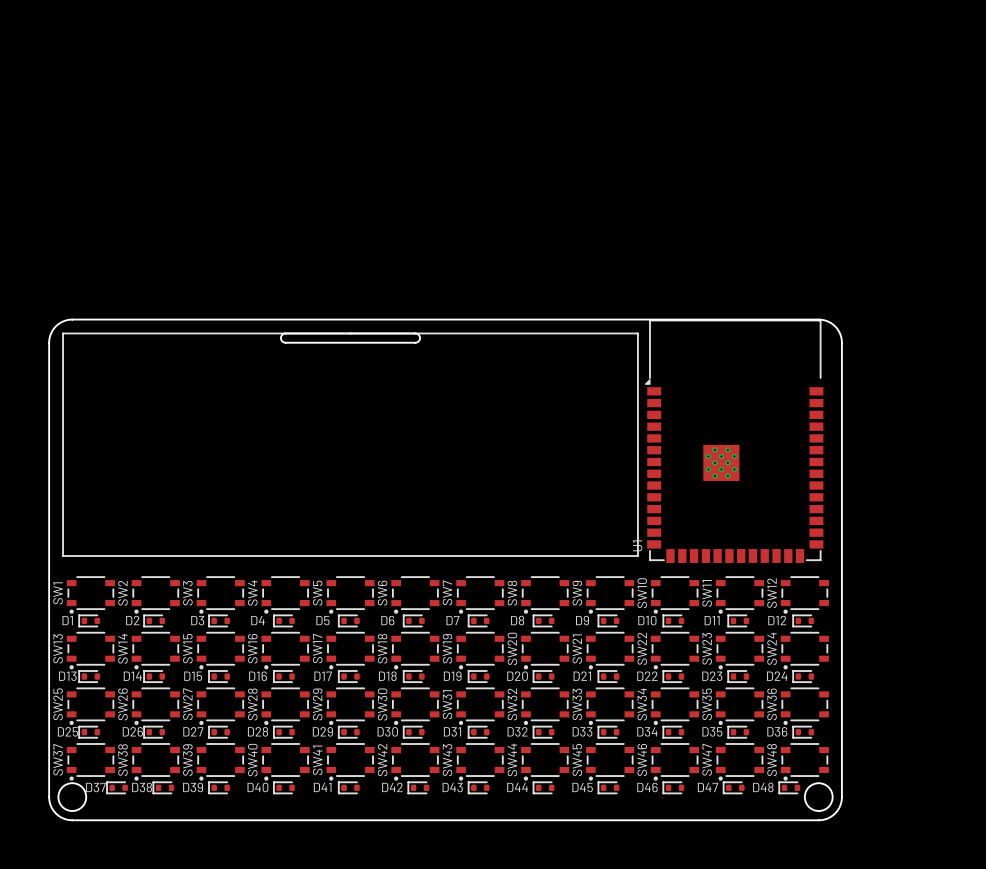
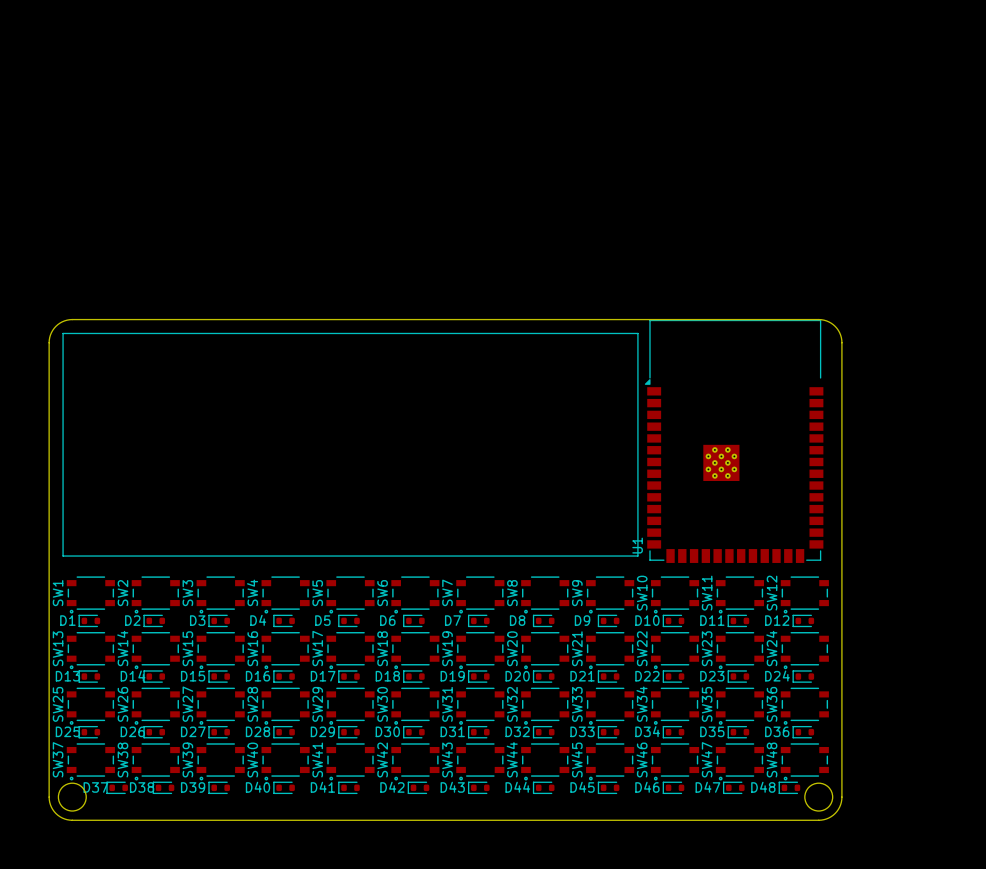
board edge: (285, 333) (415, 333) (420, 338) (415, 342) (285, 342) (280, 338) (285, 333) -> none

